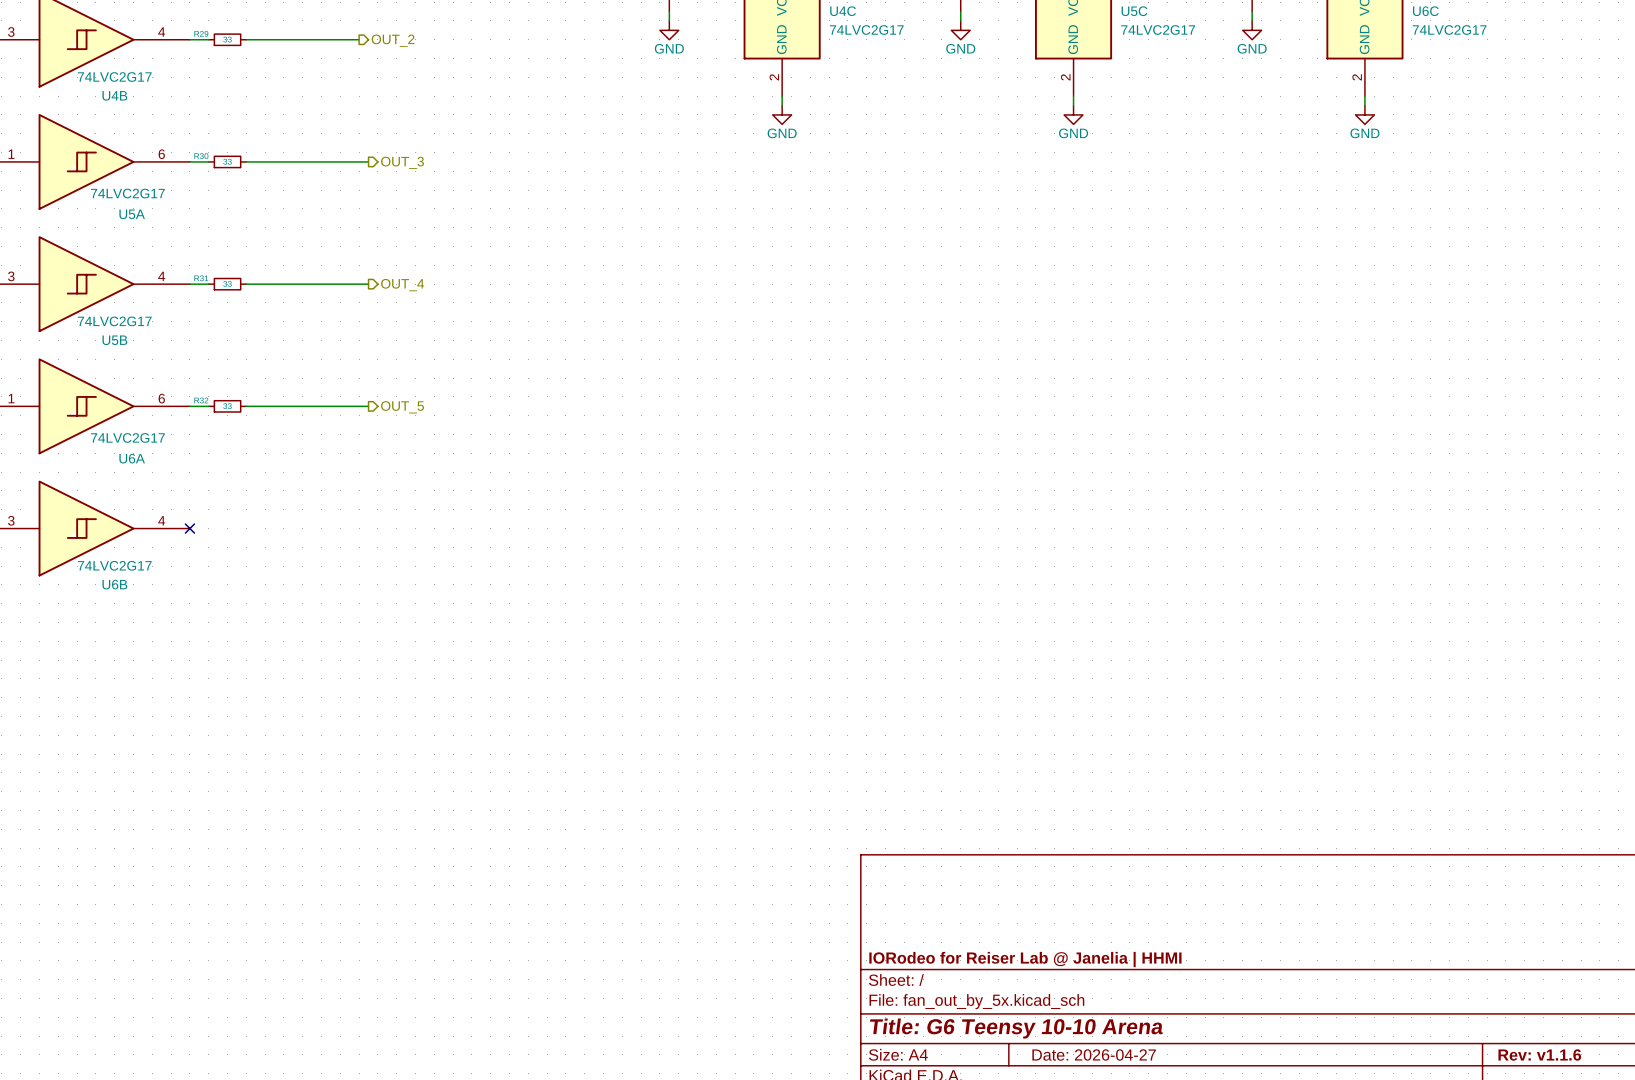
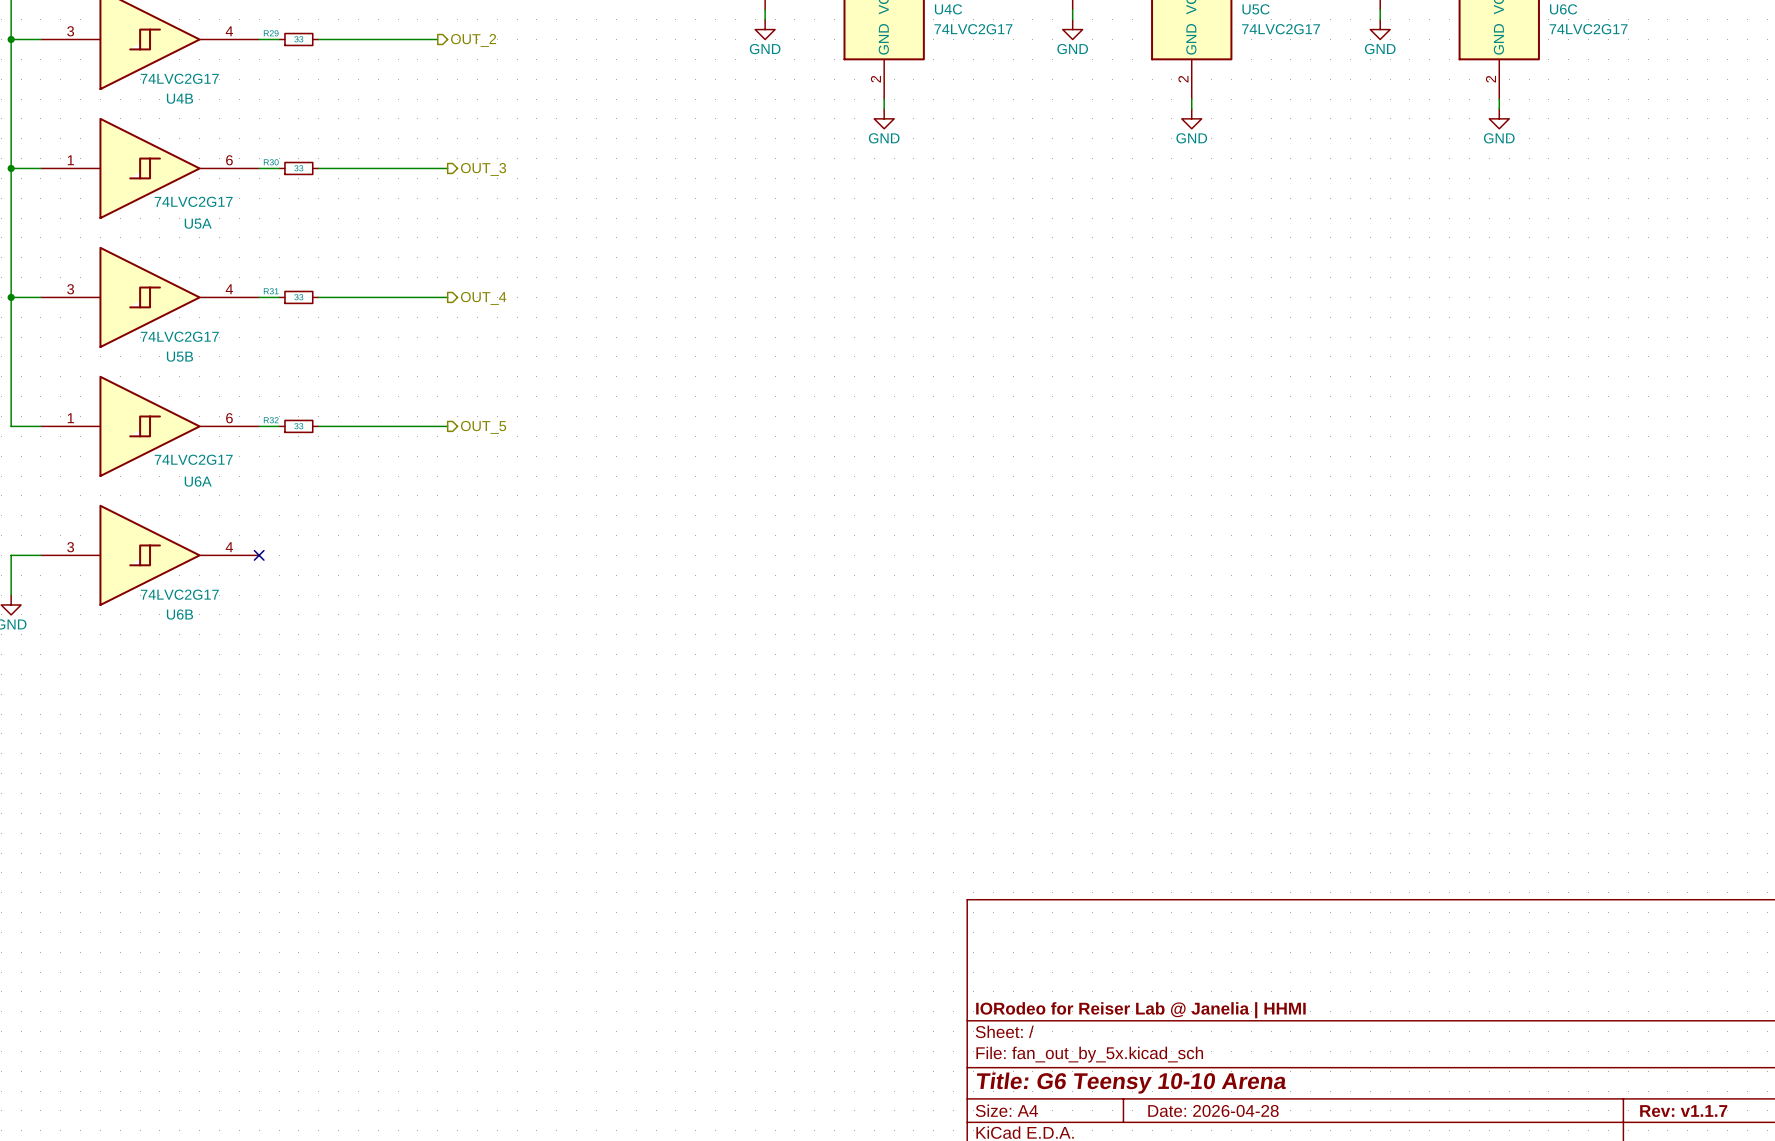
title block: Date: 2026-04-27 (1094, 1054) -> Date: 2026-04-28 (1213, 1110)
title block: Rev: v1.1.6 (1539, 1054) -> Rev: v1.1.7 (1683, 1111)

